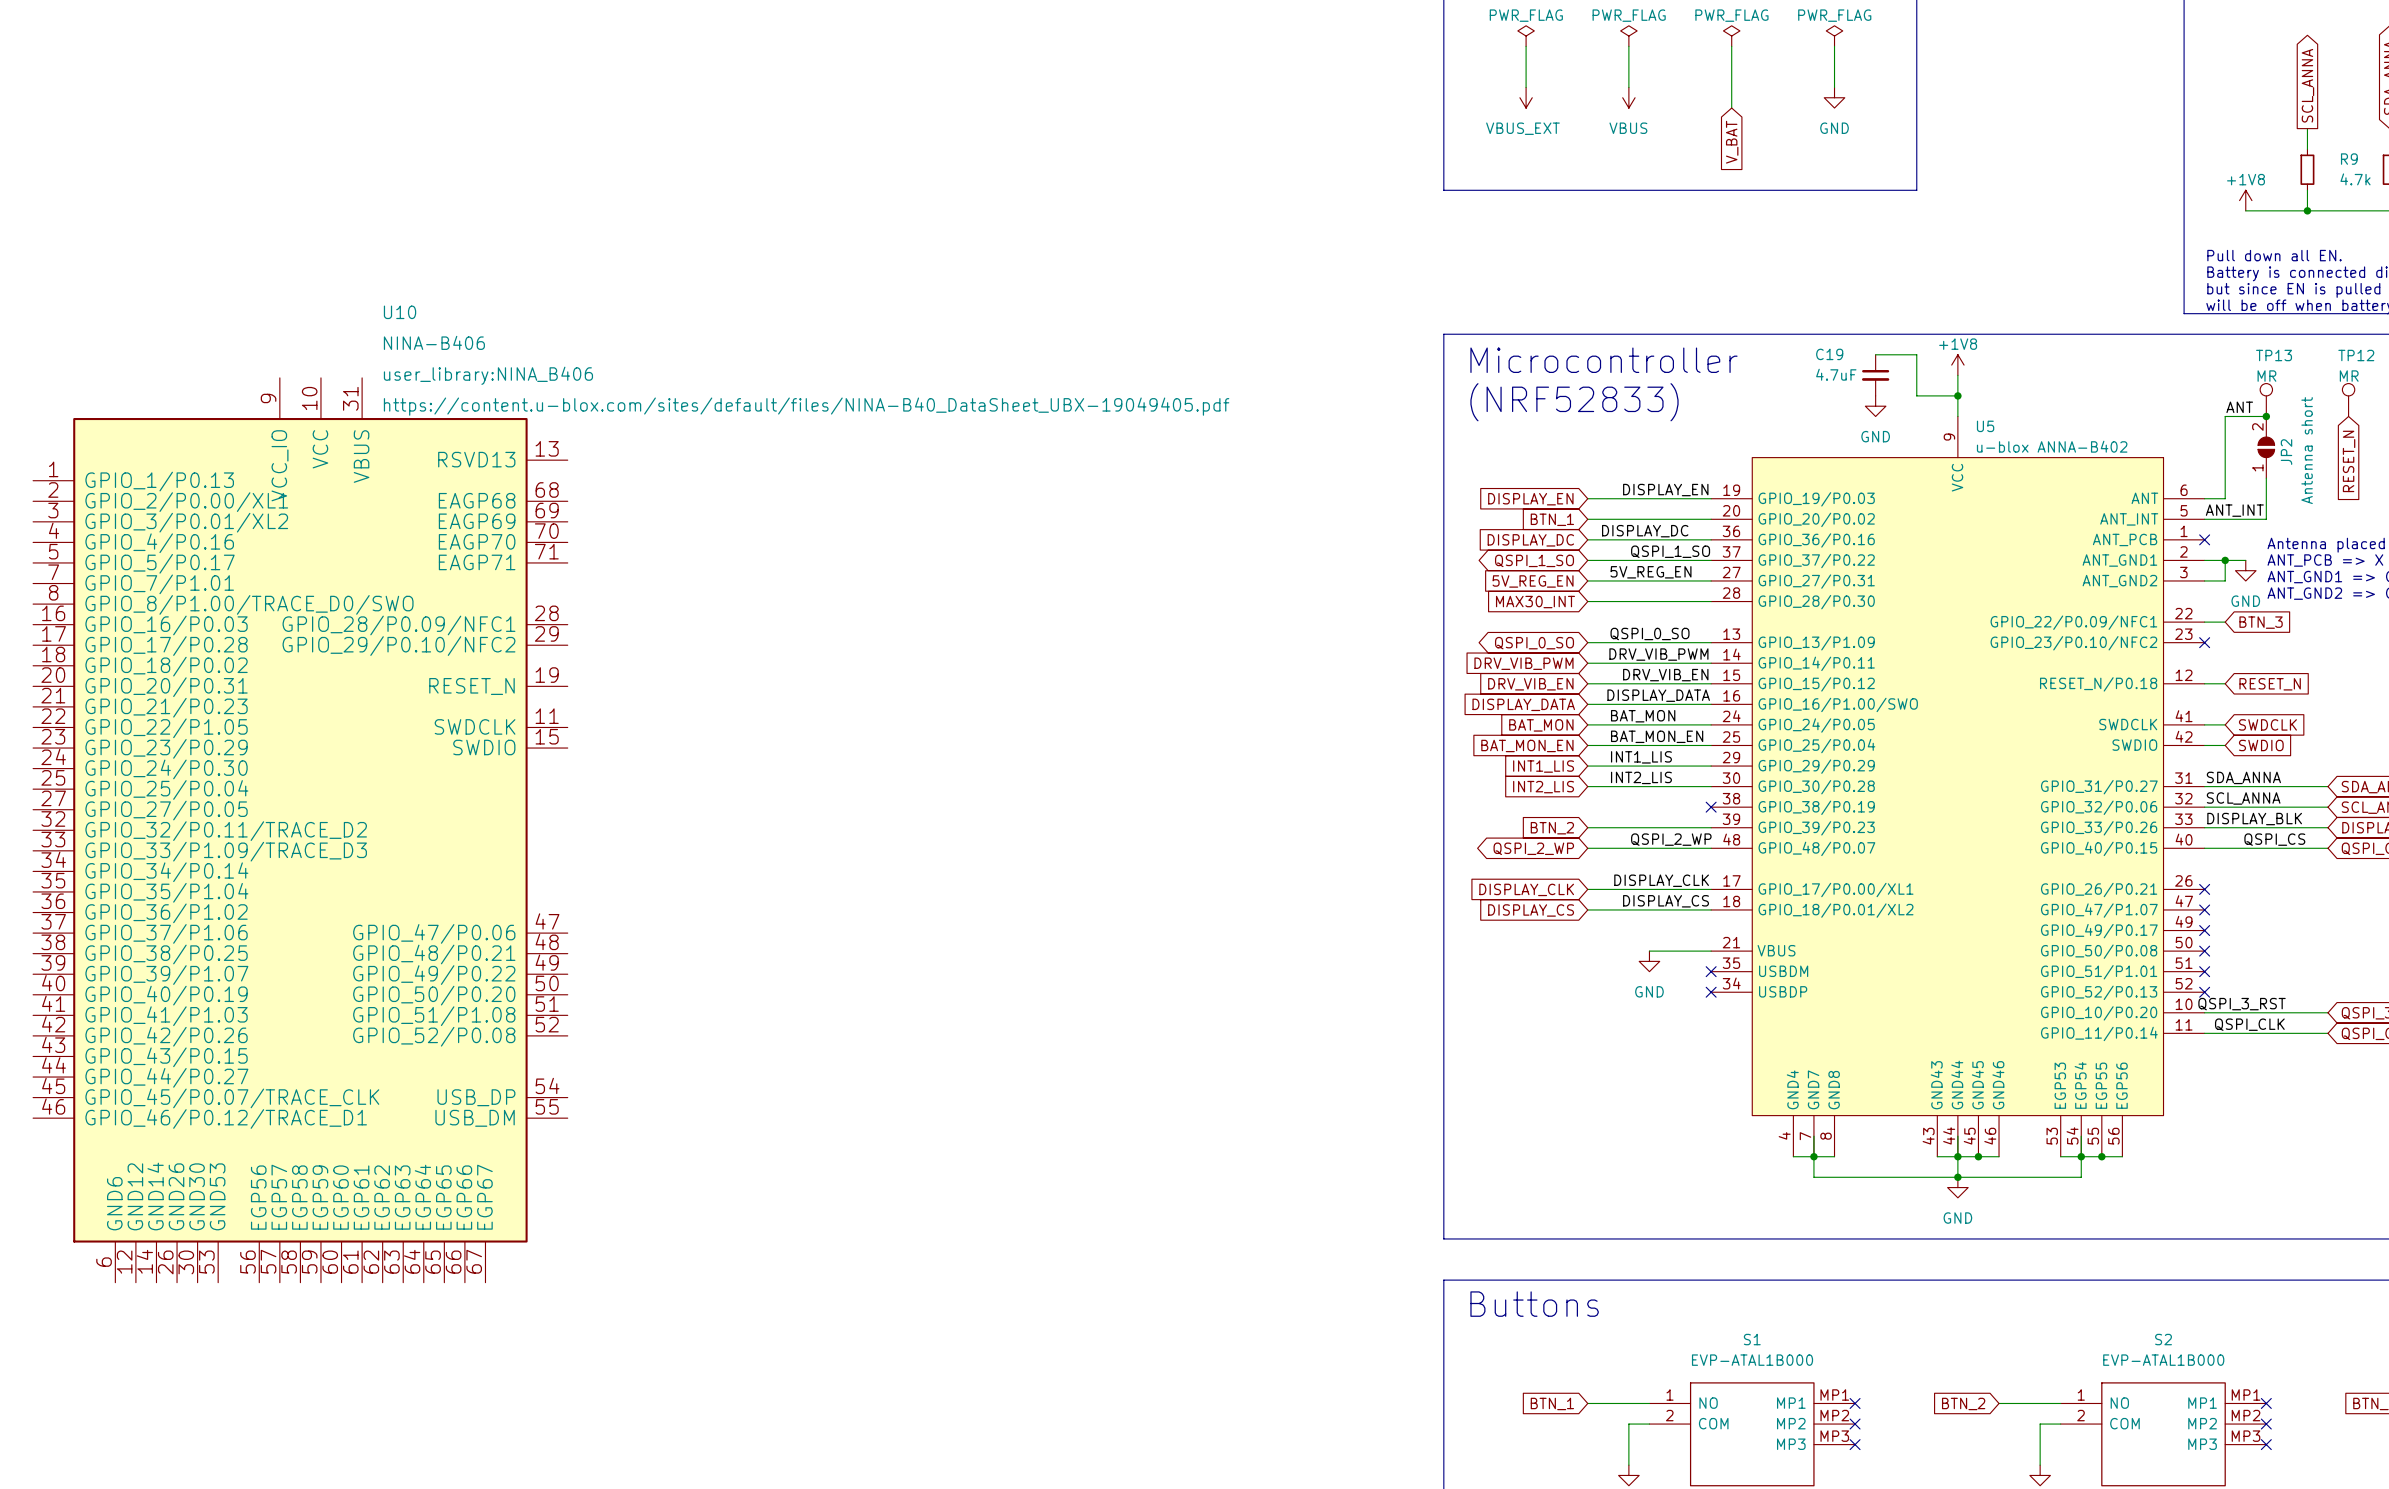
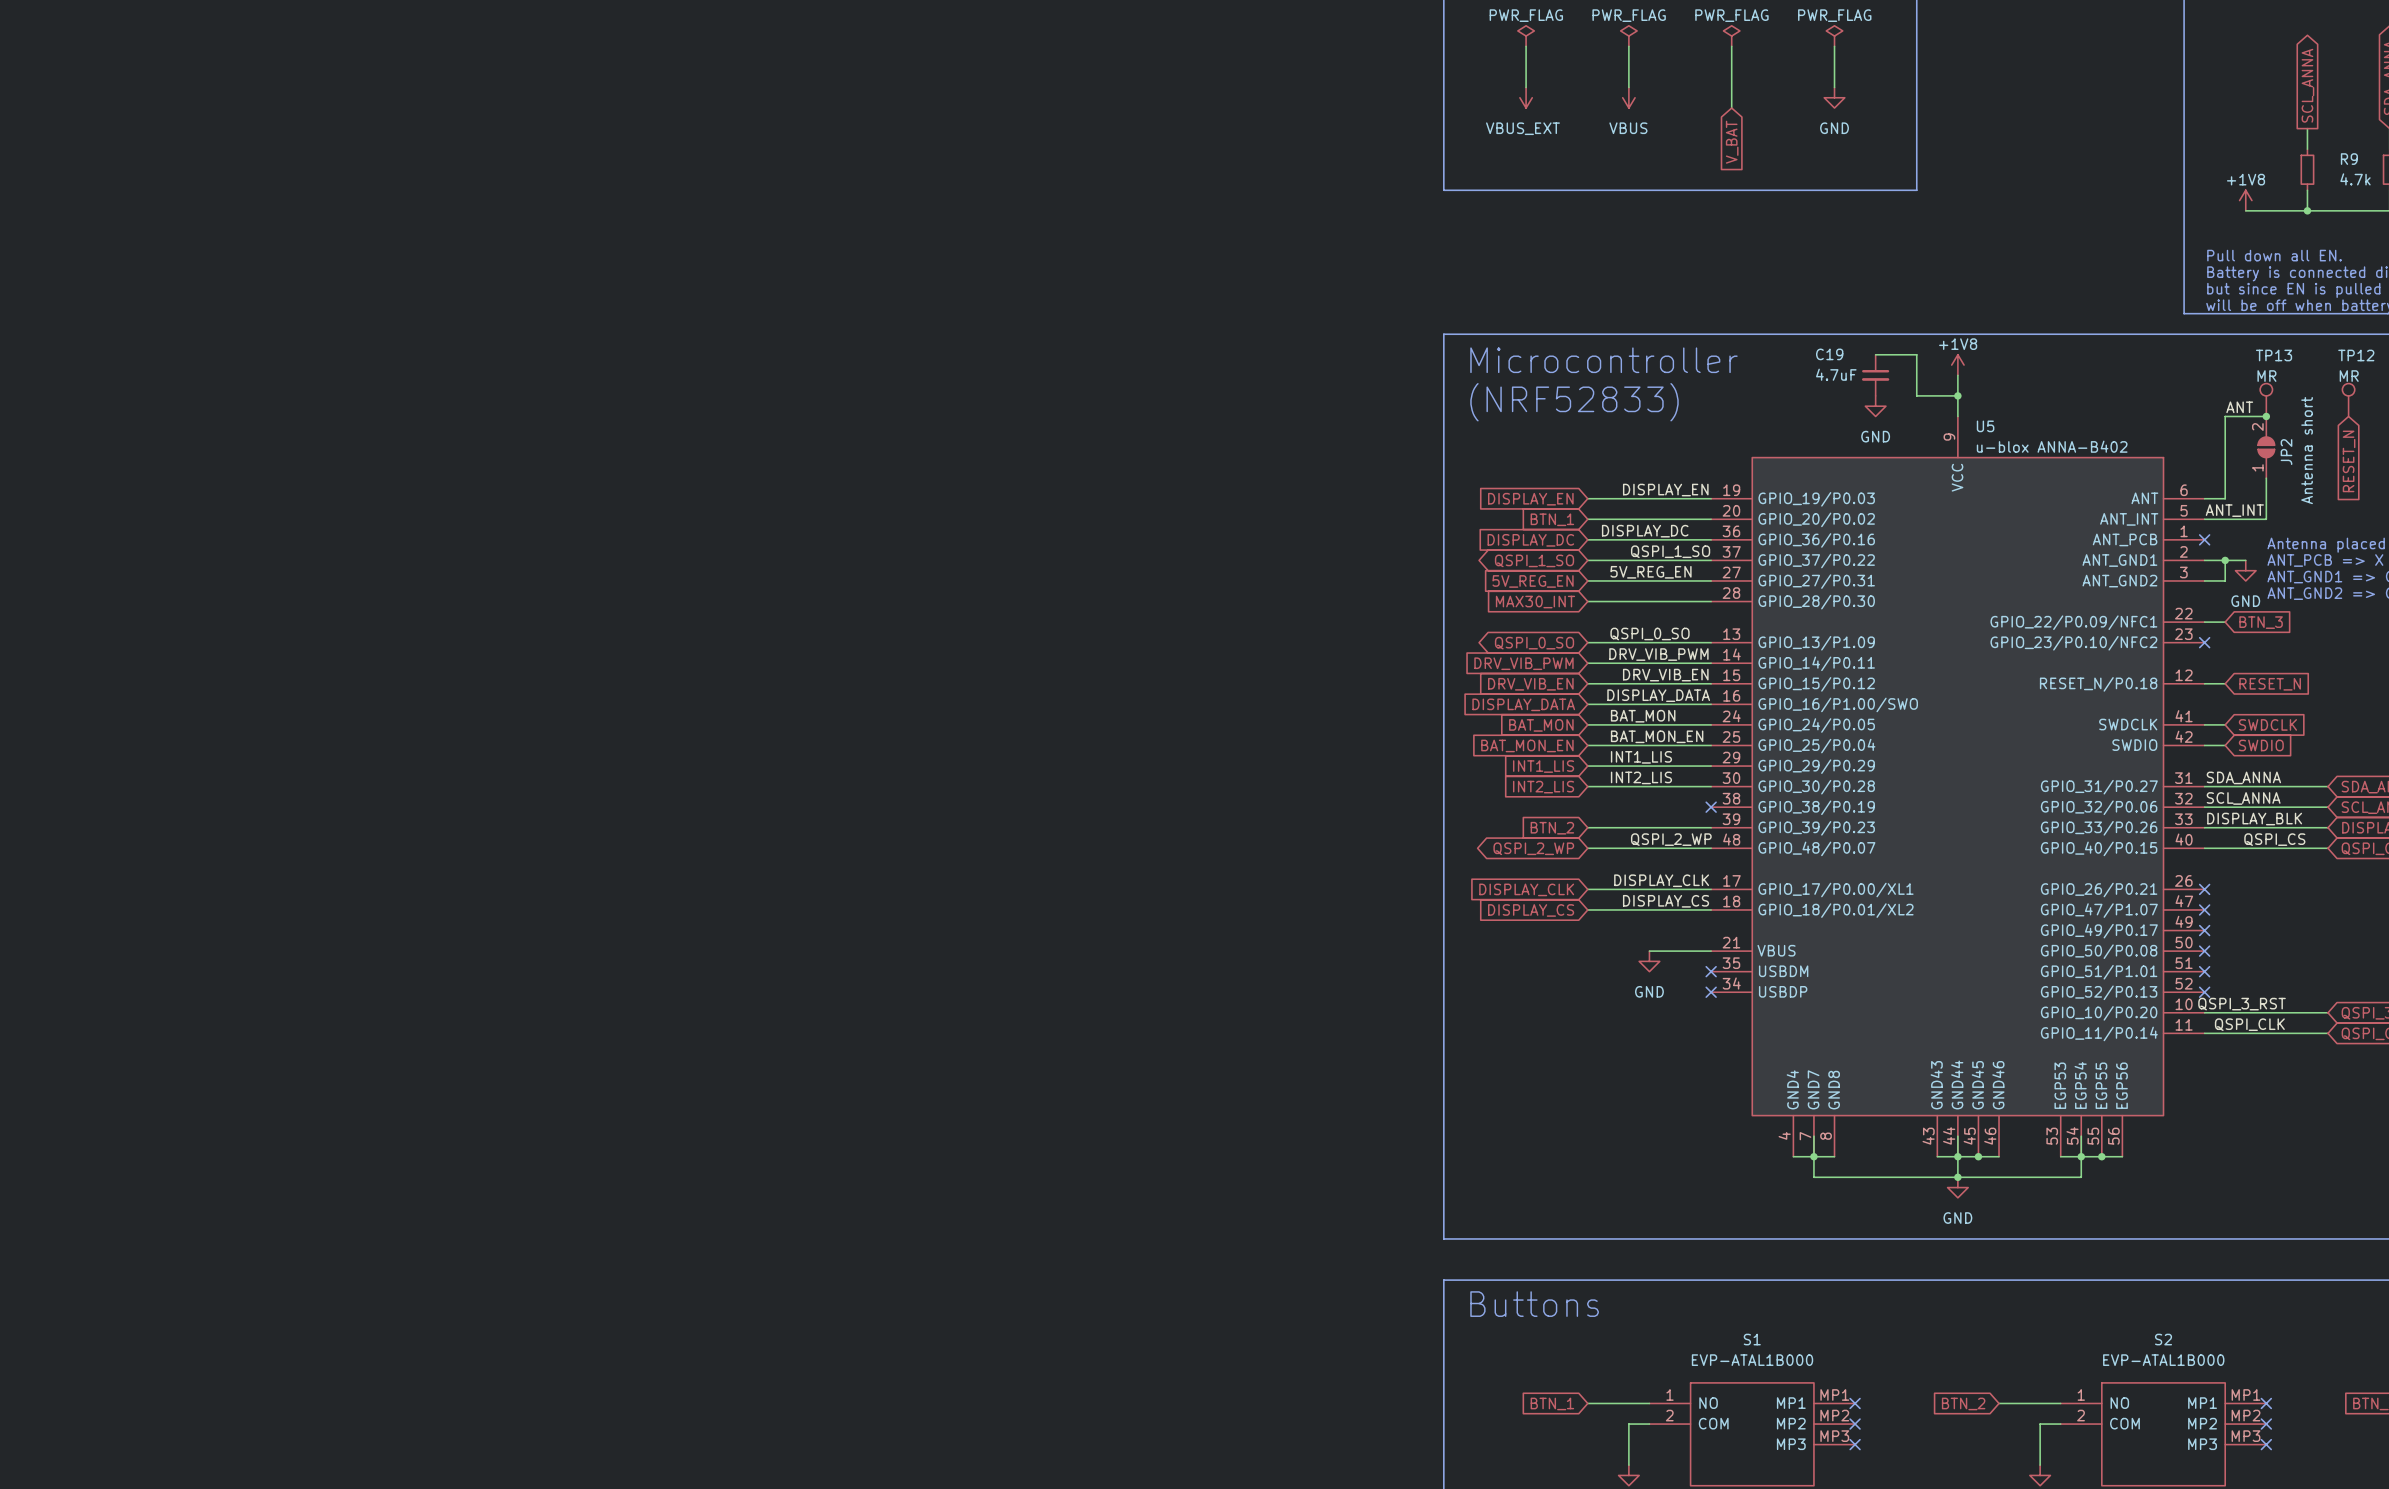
U10: NINA-B406 (300, 830) -> none

